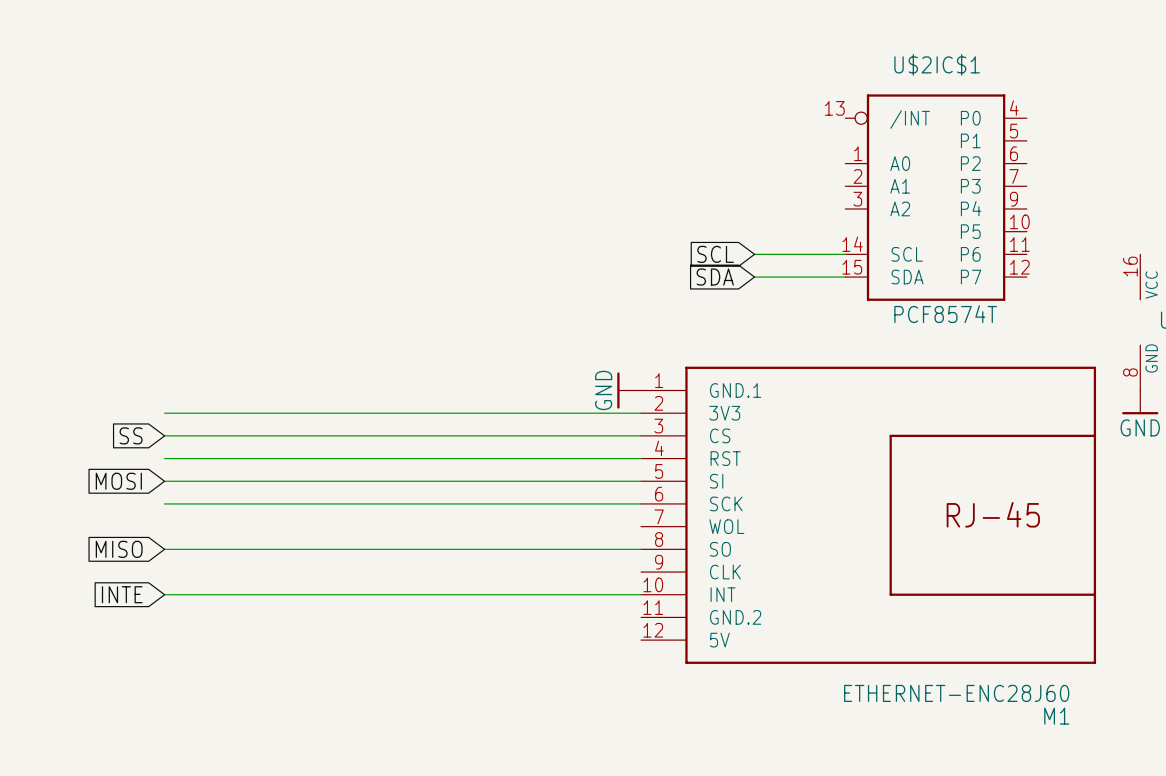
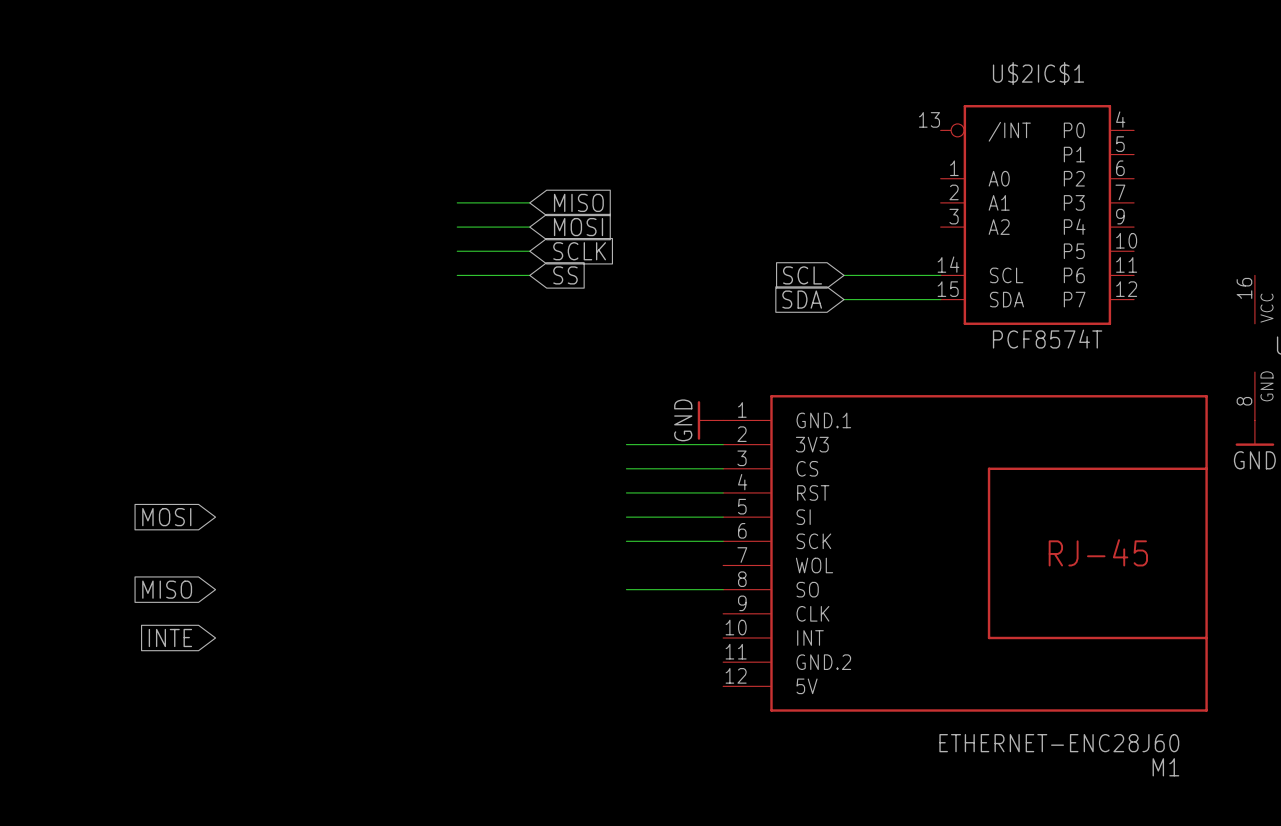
wire: none -> (457, 202) (529, 202)
global label: none -> MISO (578, 202)
wire: none -> (457, 227) (529, 227)
global label: none -> MOSI (578, 227)
wire: none -> (457, 251) (529, 251)
global label: none -> SCLK (579, 251)
wire: none -> (457, 275) (529, 275)
global label: none -> SS (565, 275)
wire: (164, 413) (550, 413) -> none
global label: SS (131, 435) -> none
wire: (164, 435) (550, 435) -> none
wire: (164, 458) (550, 458) -> none
wire: (164, 481) (550, 481) -> none
wire: (164, 503) (550, 503) -> none
wire: (164, 549) (550, 549) -> none
wire: (164, 594) (641, 594) -> none

